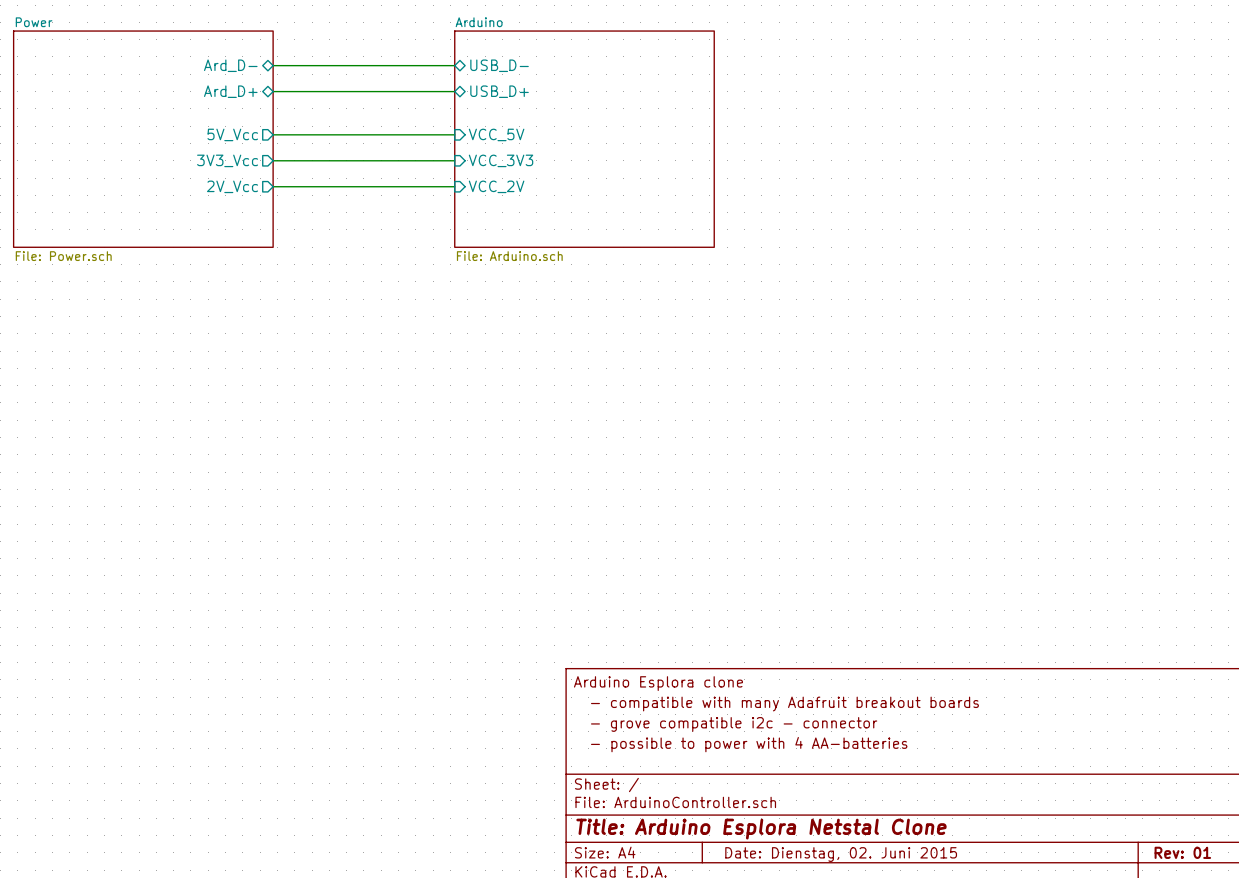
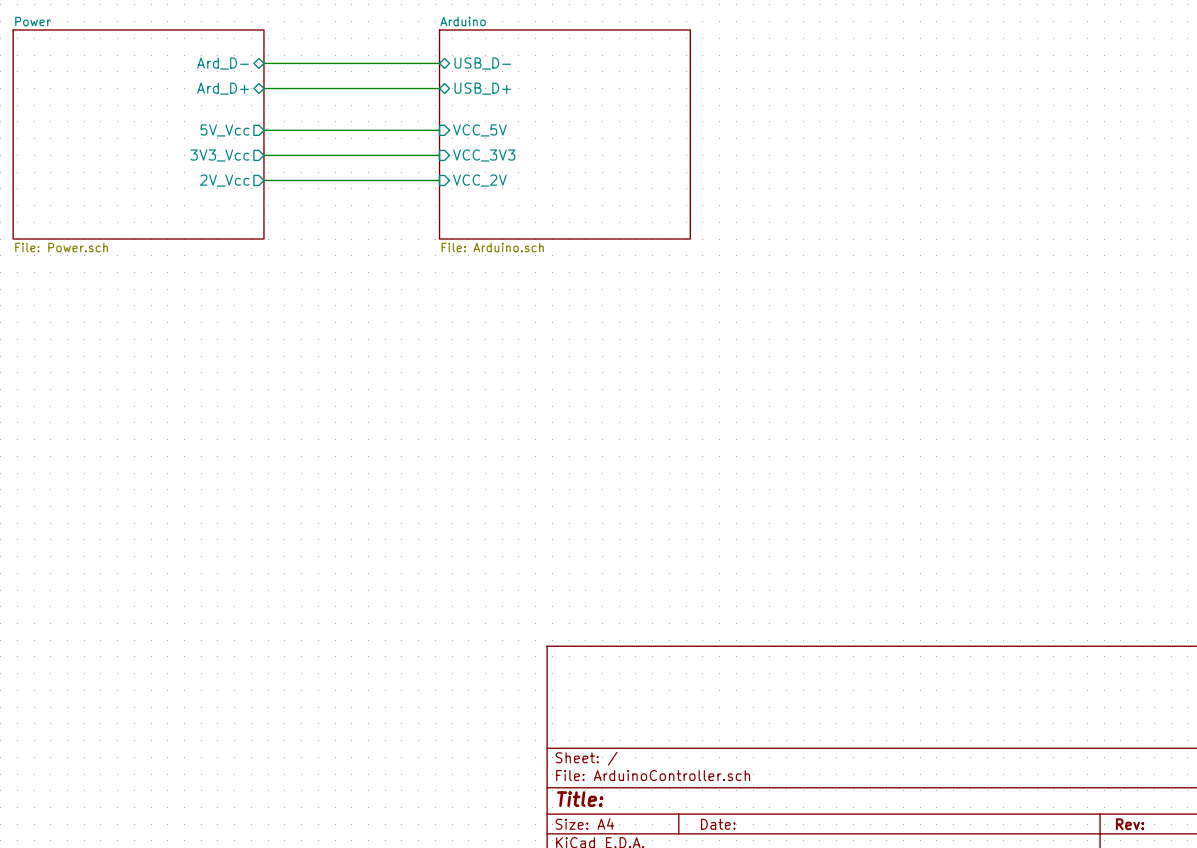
title block: Arduino Esplora clone (658, 683) -> none
title block: - compatible with many Adafruit breakout boards (784, 704) -> none
title block: - grove compatible i2c - connector (734, 724) -> none
title block: - possible to power with 4 AA-batteries (749, 744) -> none
title block: Title: Arduino Esplora Netstal Clone (761, 829) -> Title: (580, 799)
title block: Rev: 01 (1182, 852) -> Rev: (1130, 824)
title block: Date: Dienstag, 02. Juni 2015 (841, 854) -> Date: (718, 824)

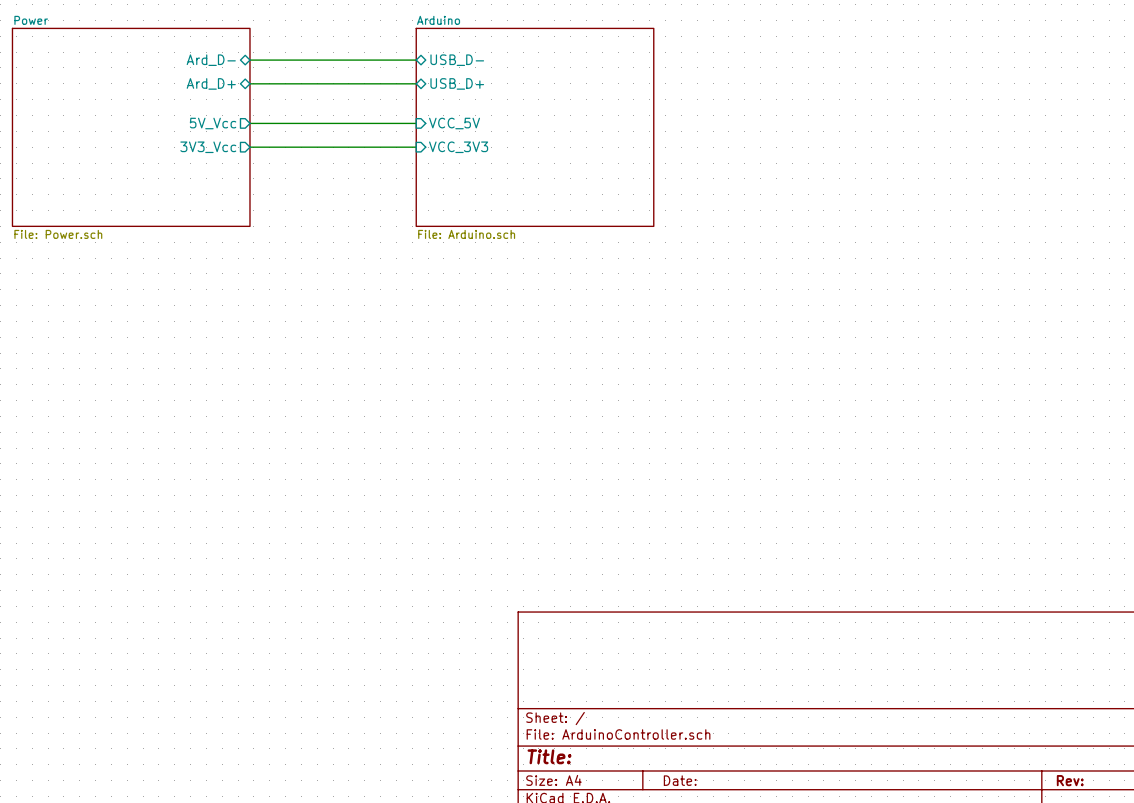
sheet pin: 2V_Vcc (224, 180) -> none
wire: (263, 180) (439, 180) -> none
sheet pin: VCC_2V (479, 180) -> none

